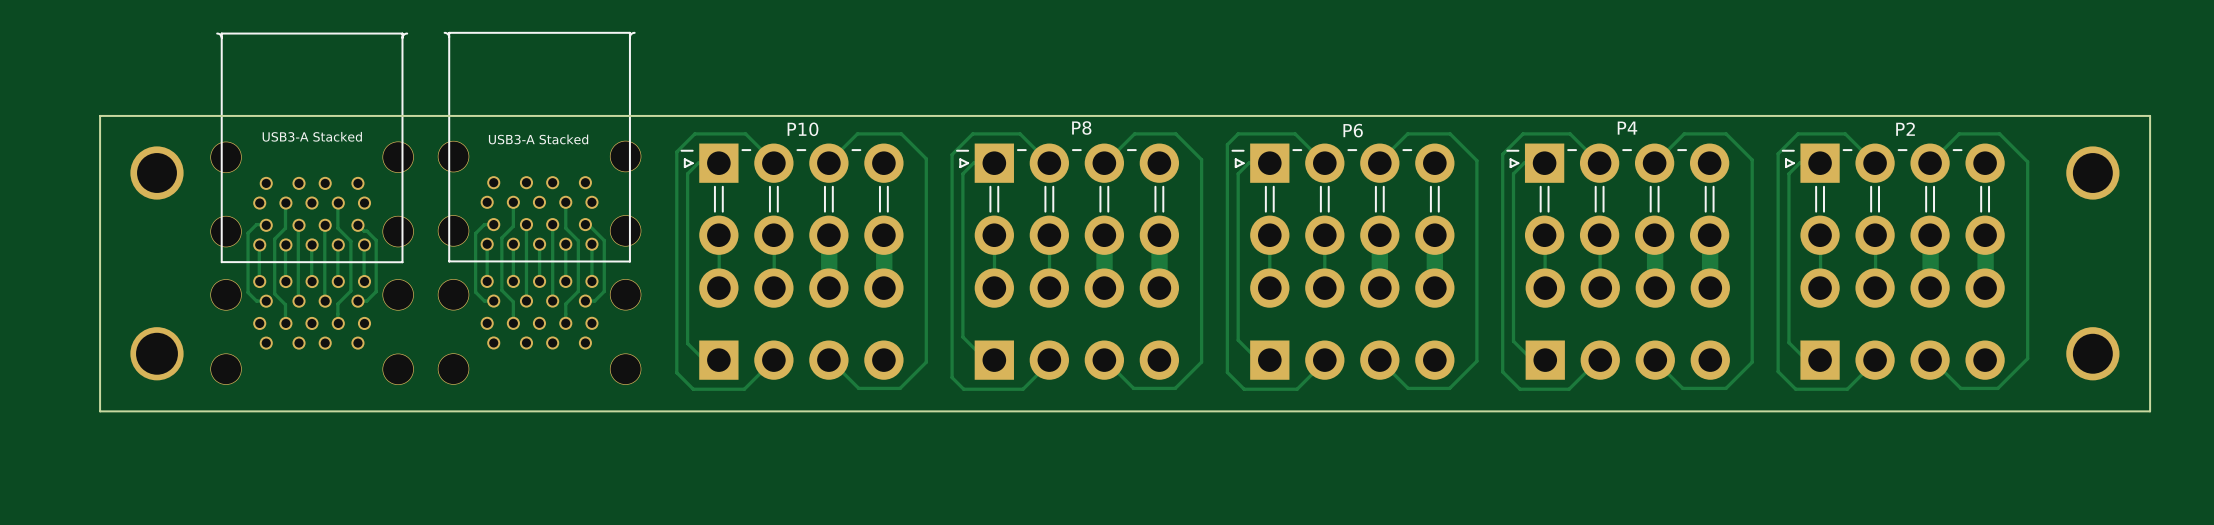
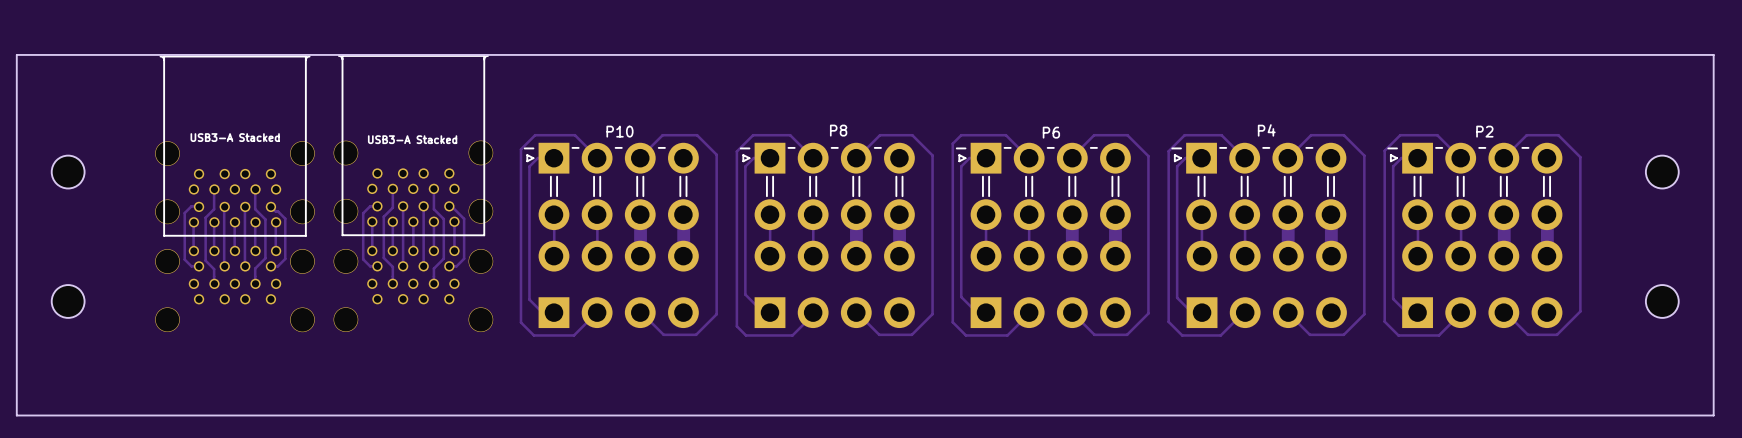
board edge: (2150, 115) (100, 115) (100, 411) (2150, 411) (2150, 115) -> (1713, 54) (1713, 415) (16, 415) (16, 54) (1713, 54)
part: (156, 173) -> none
part: (2092, 173) -> none
part: none -> (68, 172)
part: none -> (1662, 172)
part: none -> (68, 301)
part: none -> (1662, 301)
part: (156, 353) -> none
part: (2092, 353) -> none

